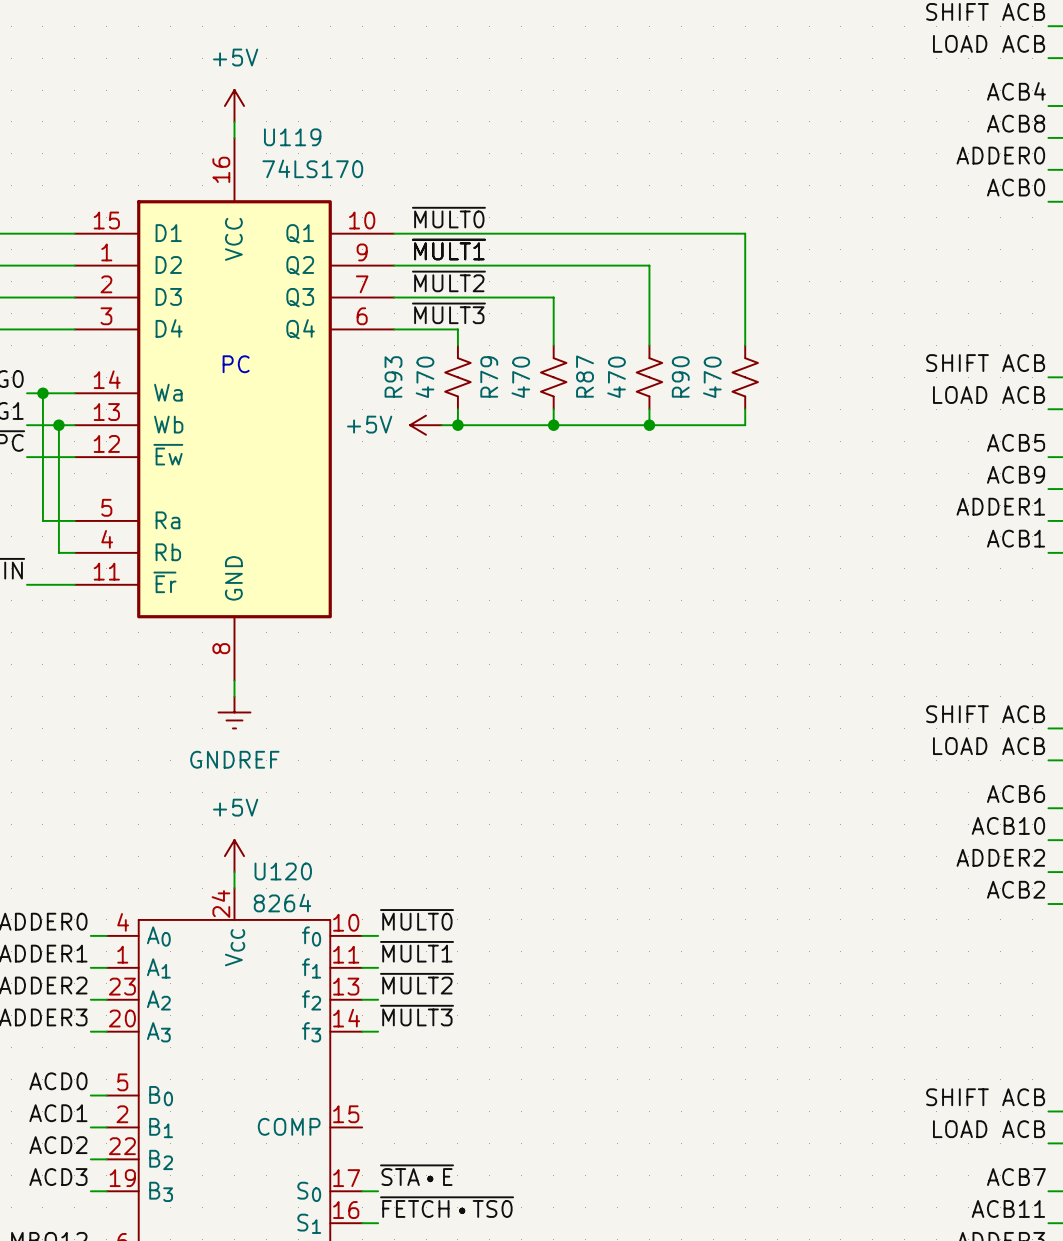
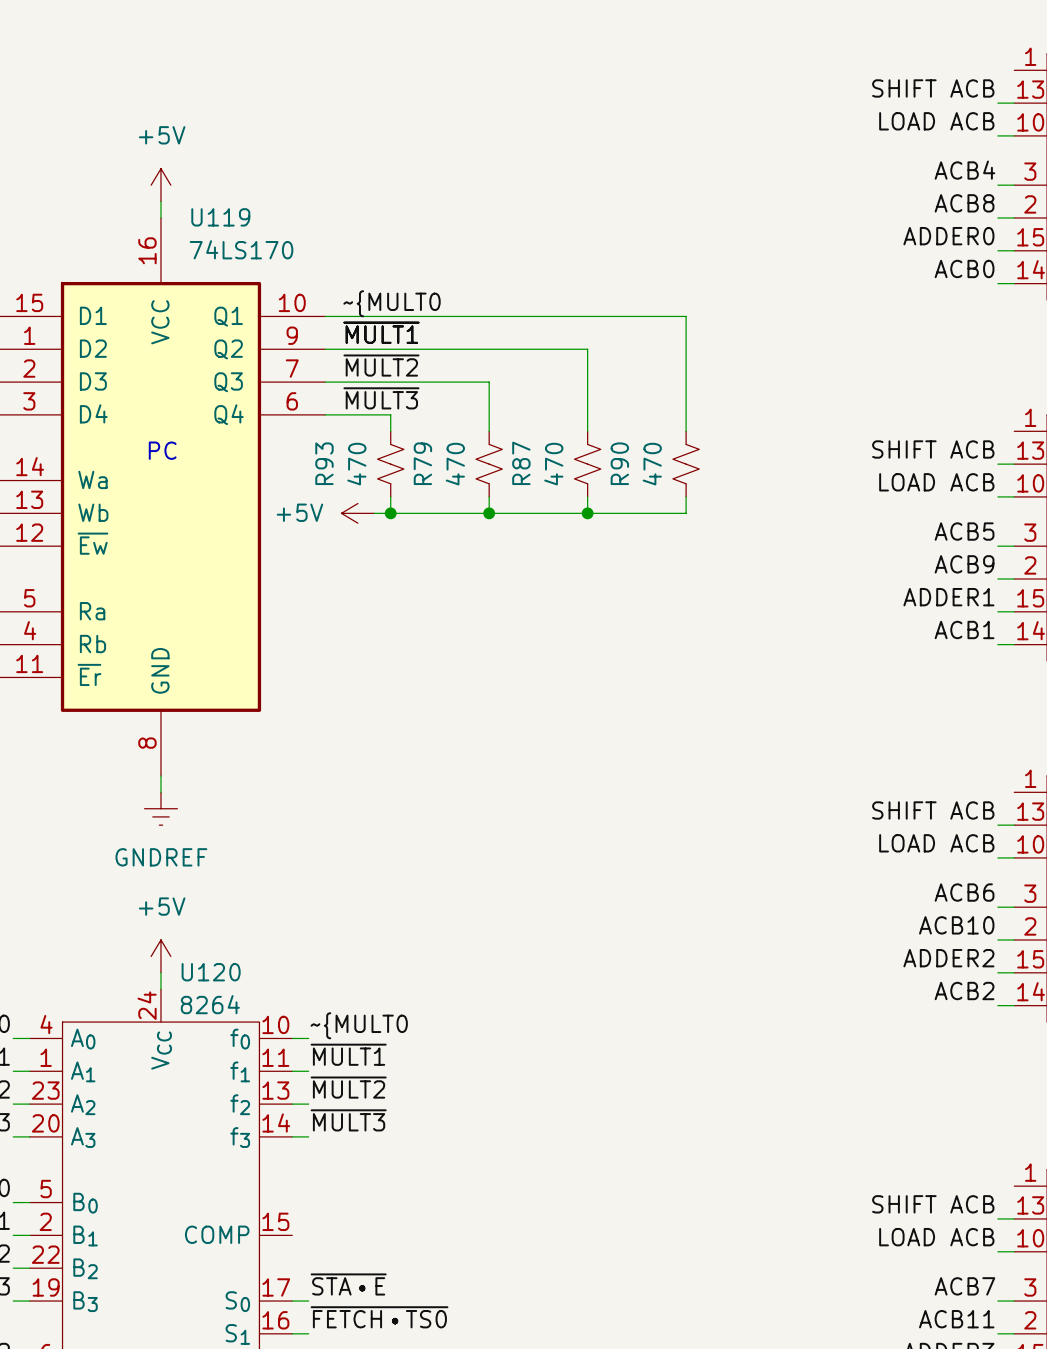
label: ~{MULT0} (448, 217) -> ~{MULT0 (392, 303)
label: ~{MULT0} (417, 919) -> ~{MULT0 (359, 1025)

